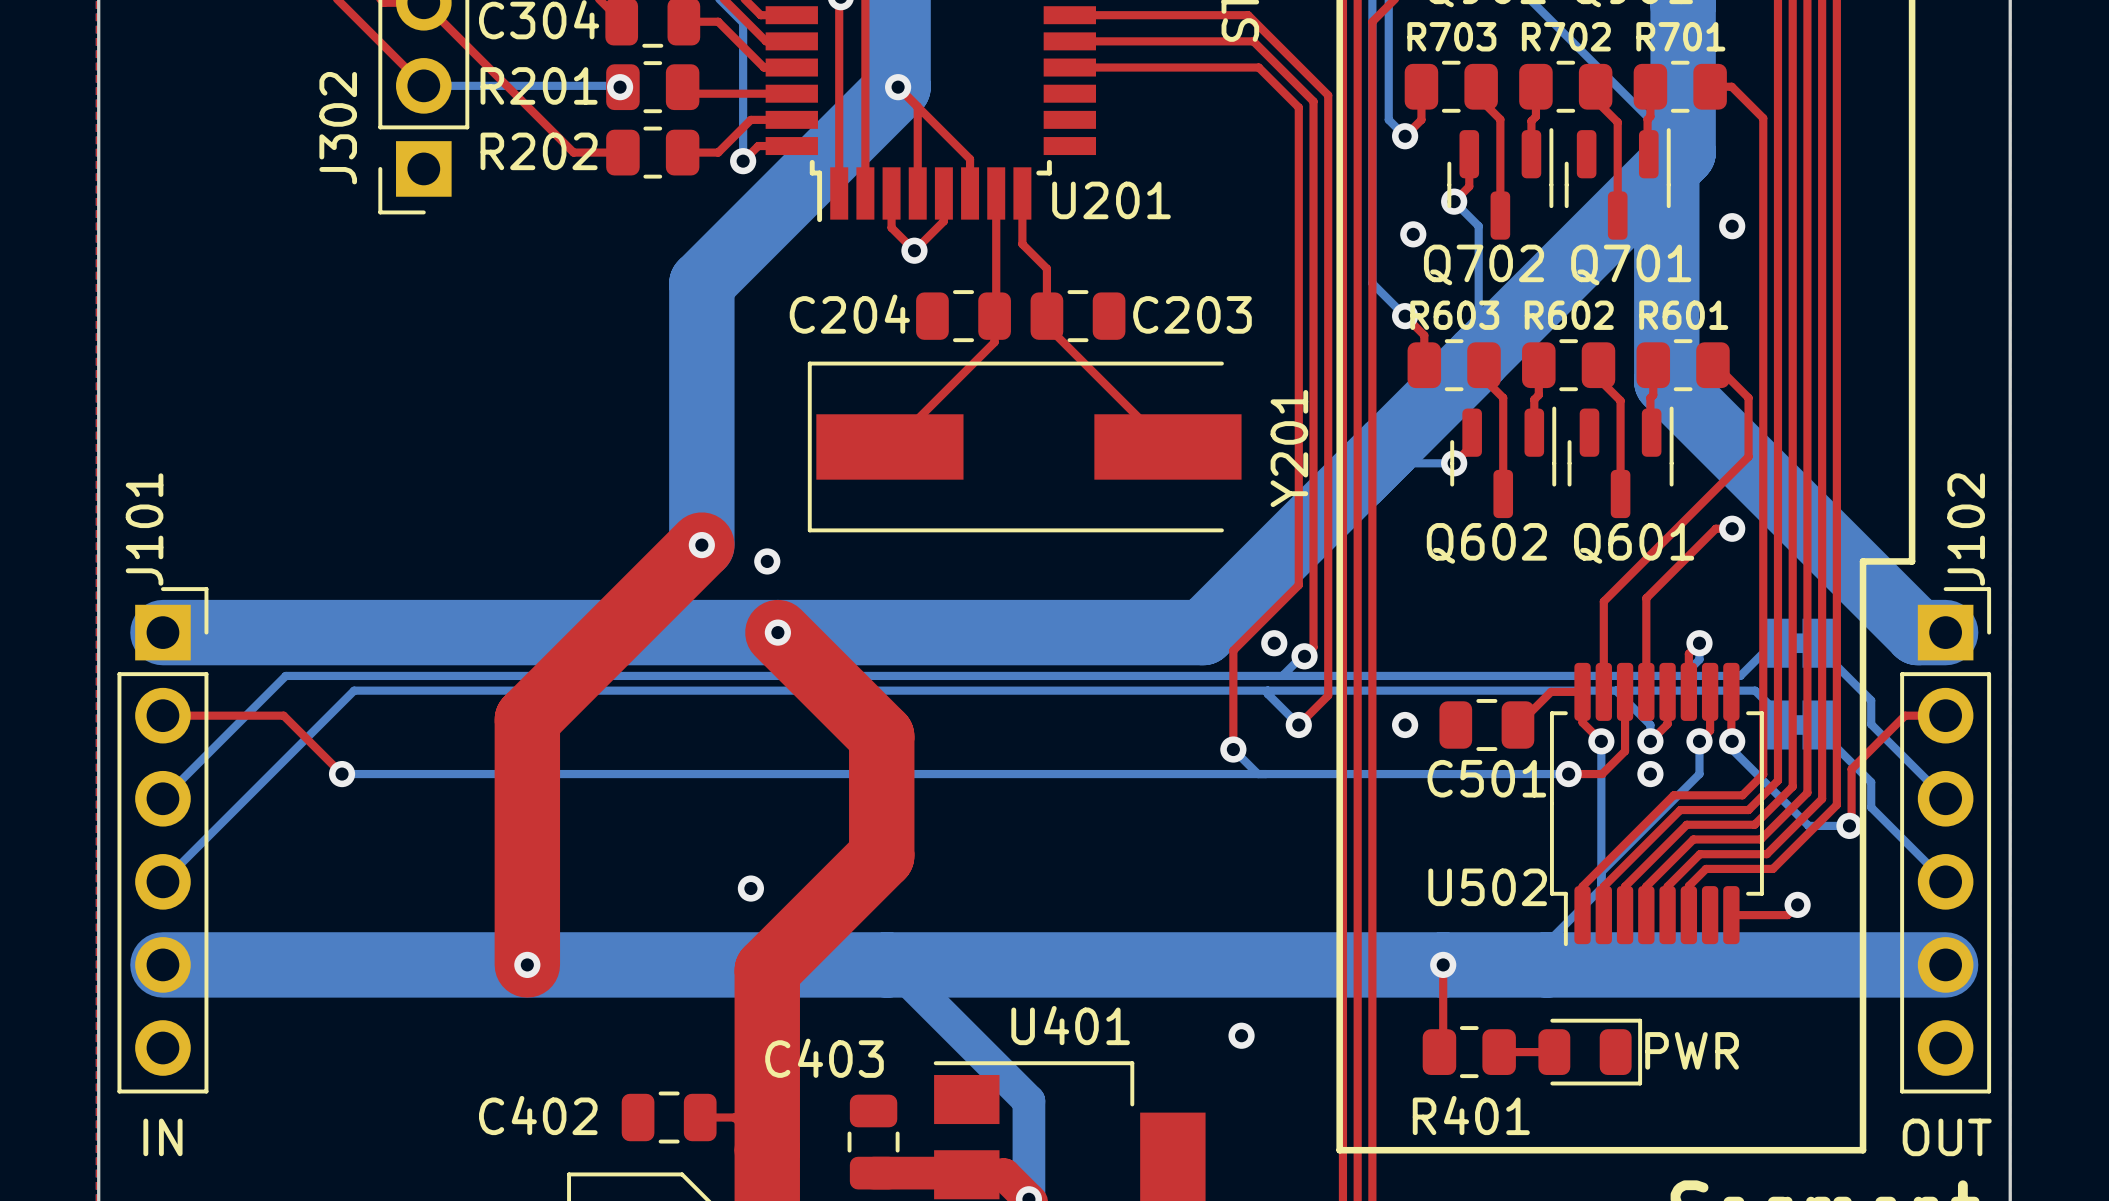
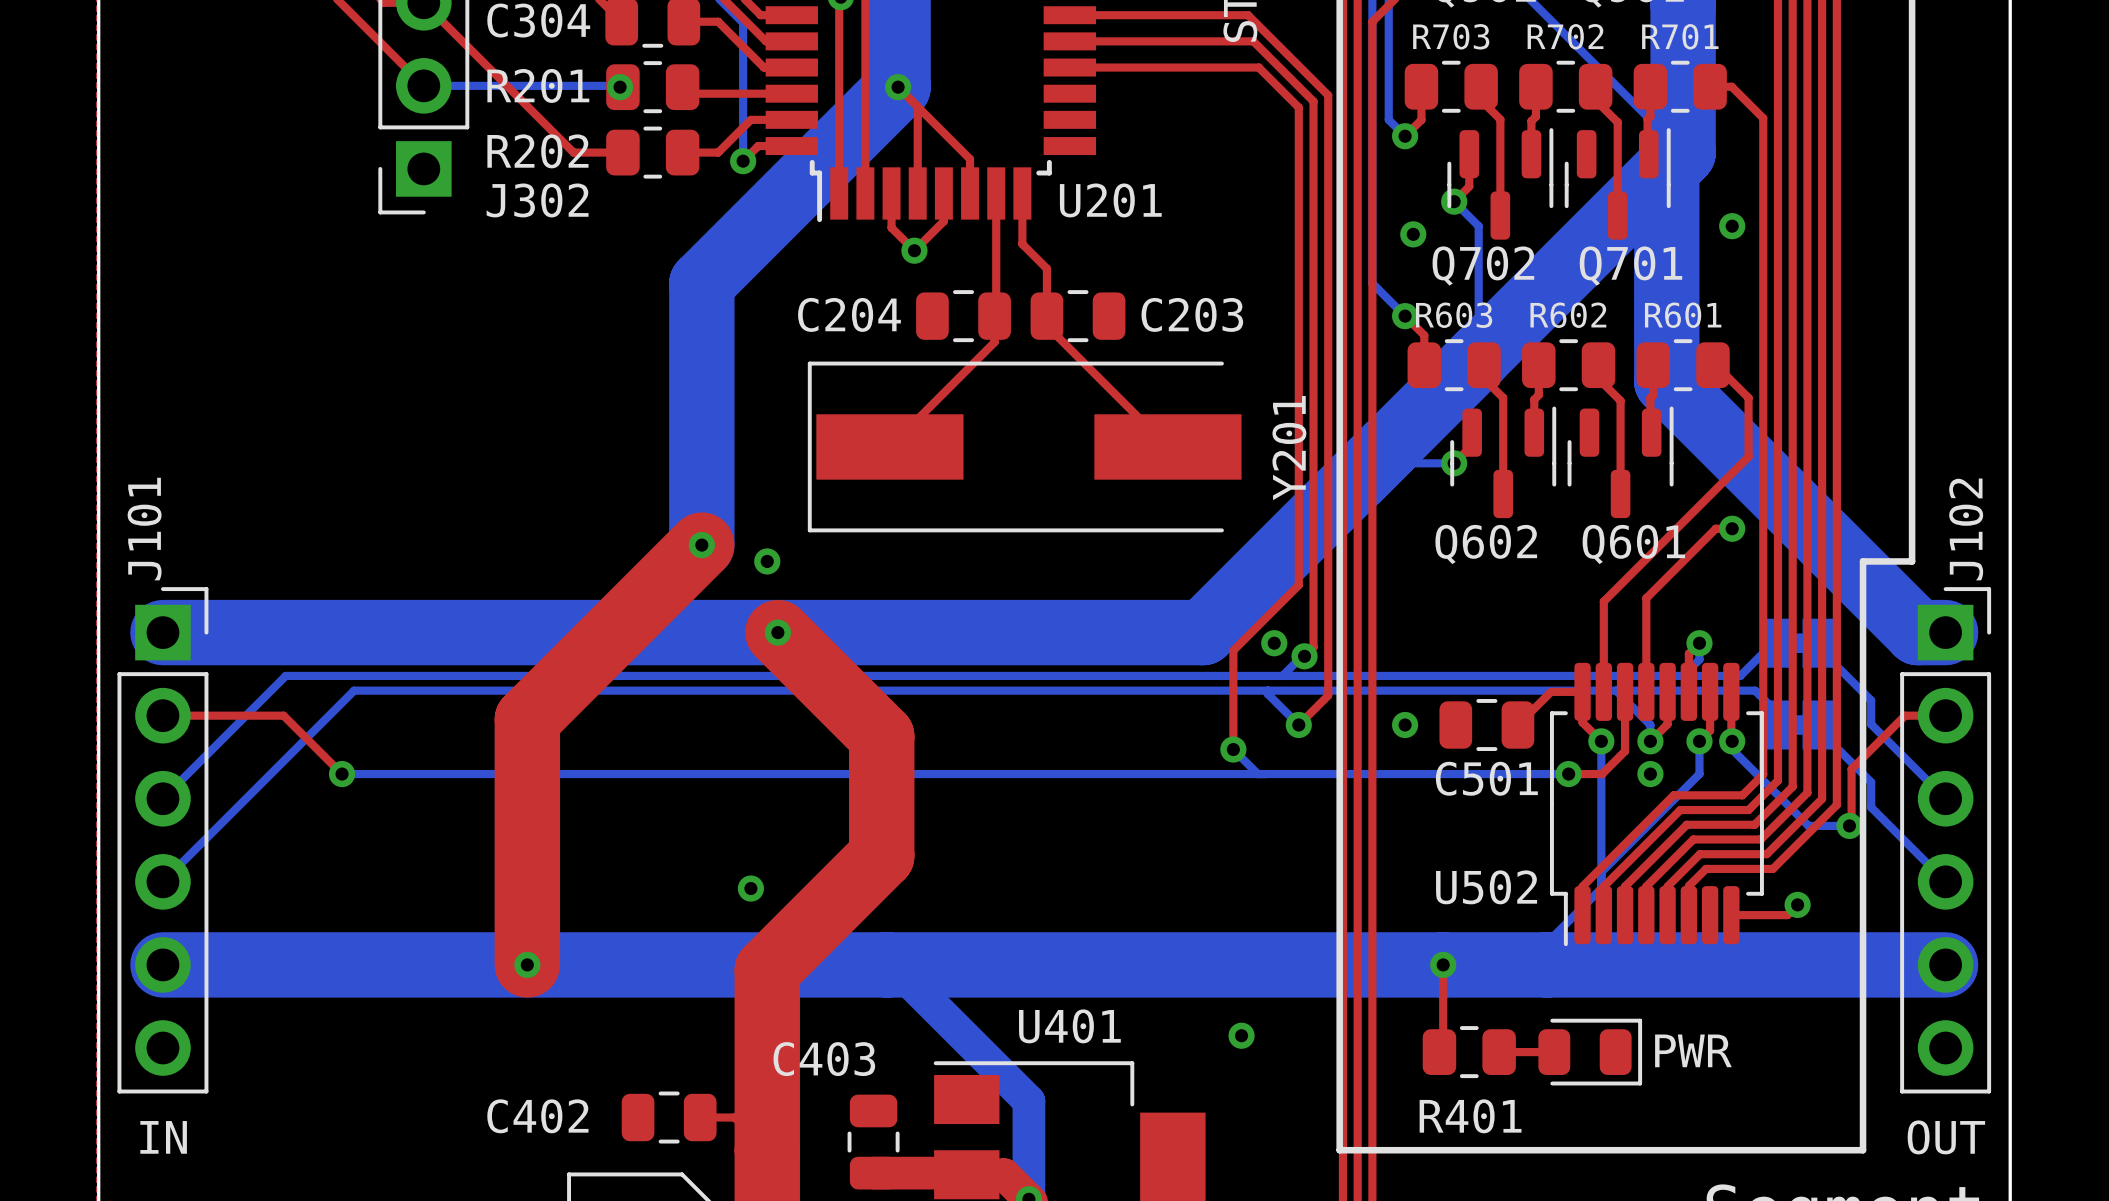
J302 name rotation: 0° (338, 128) -> 90° clockwise (537, 200)
J302 name position: J302 (338, 128) -> J302 (537, 200)

